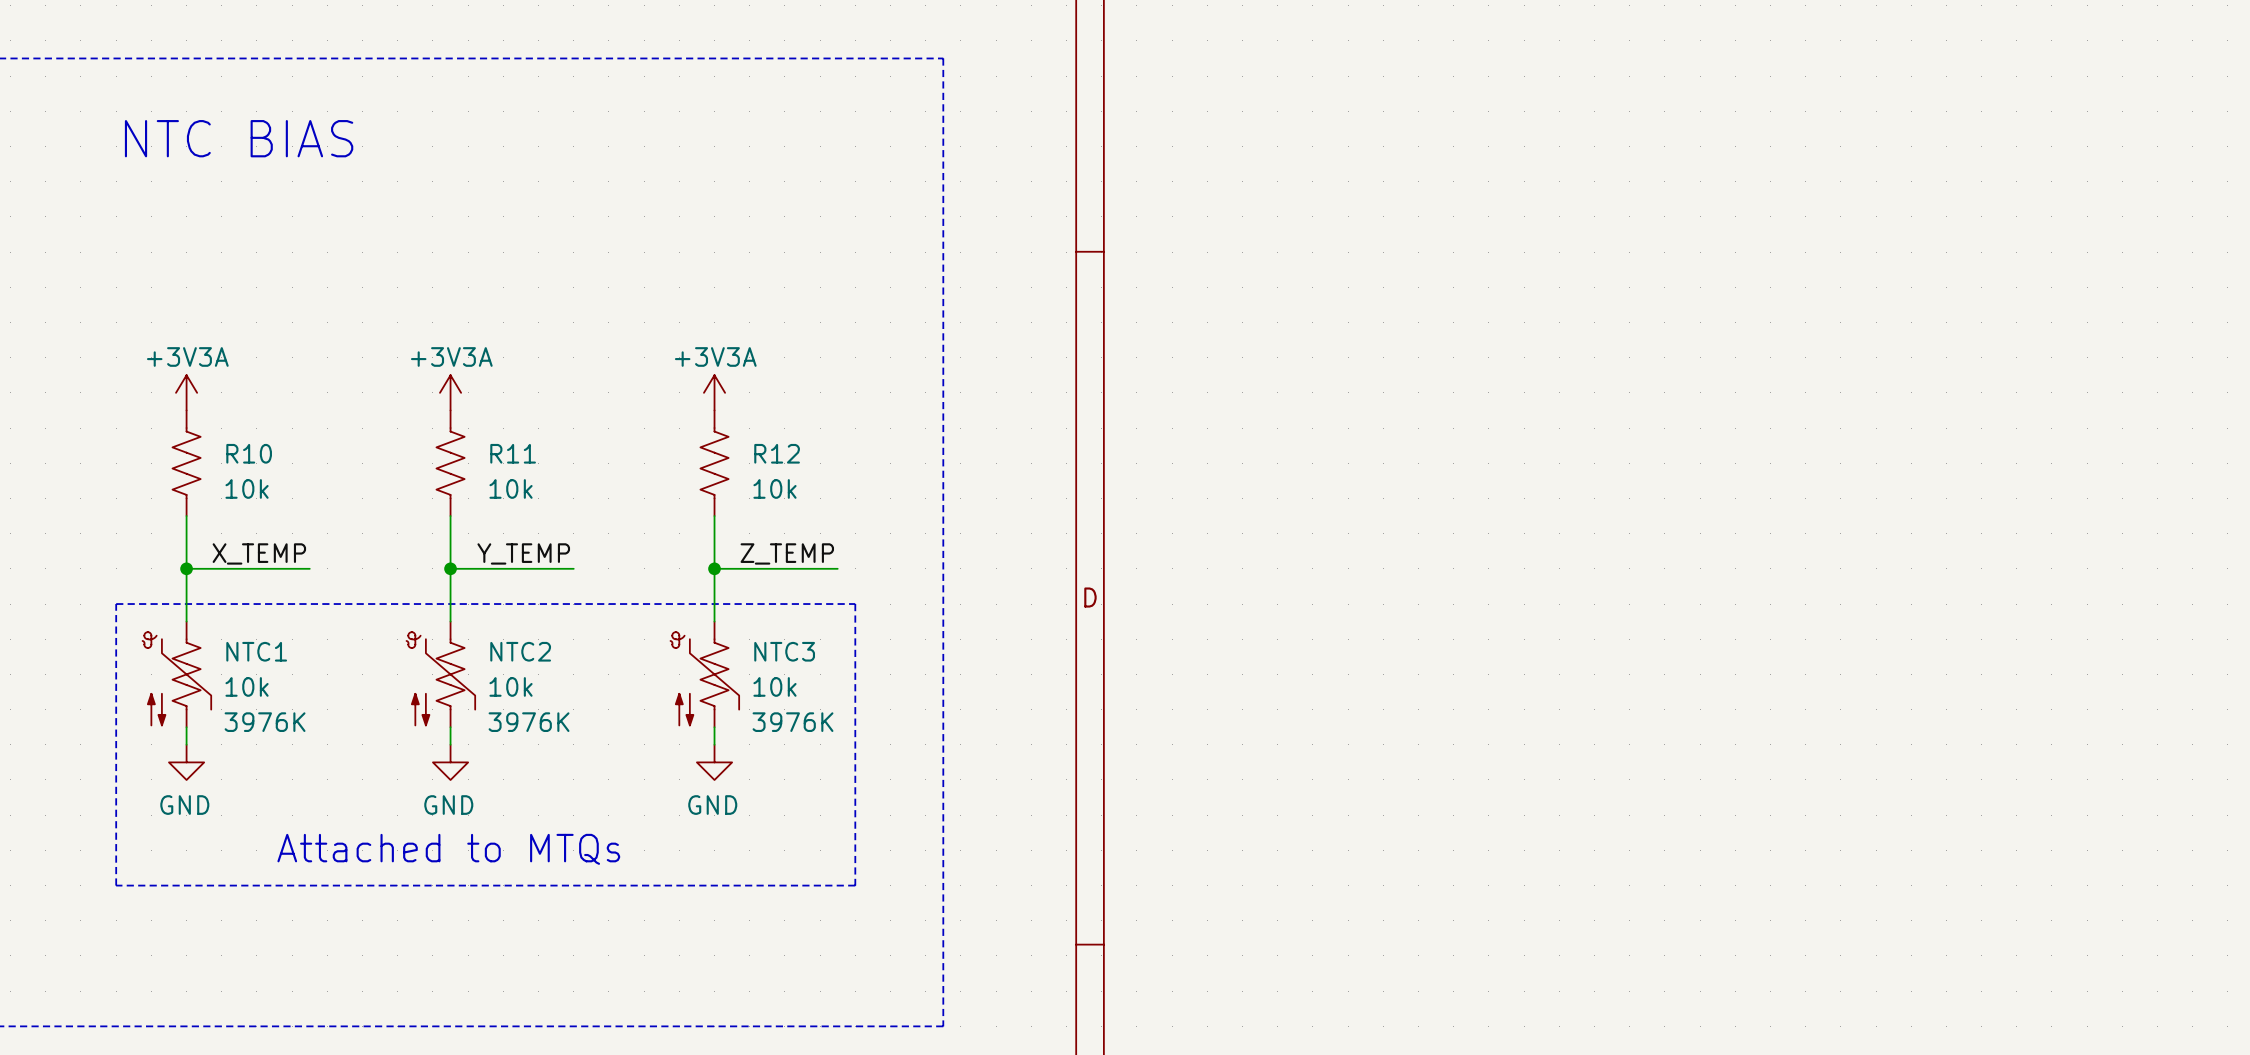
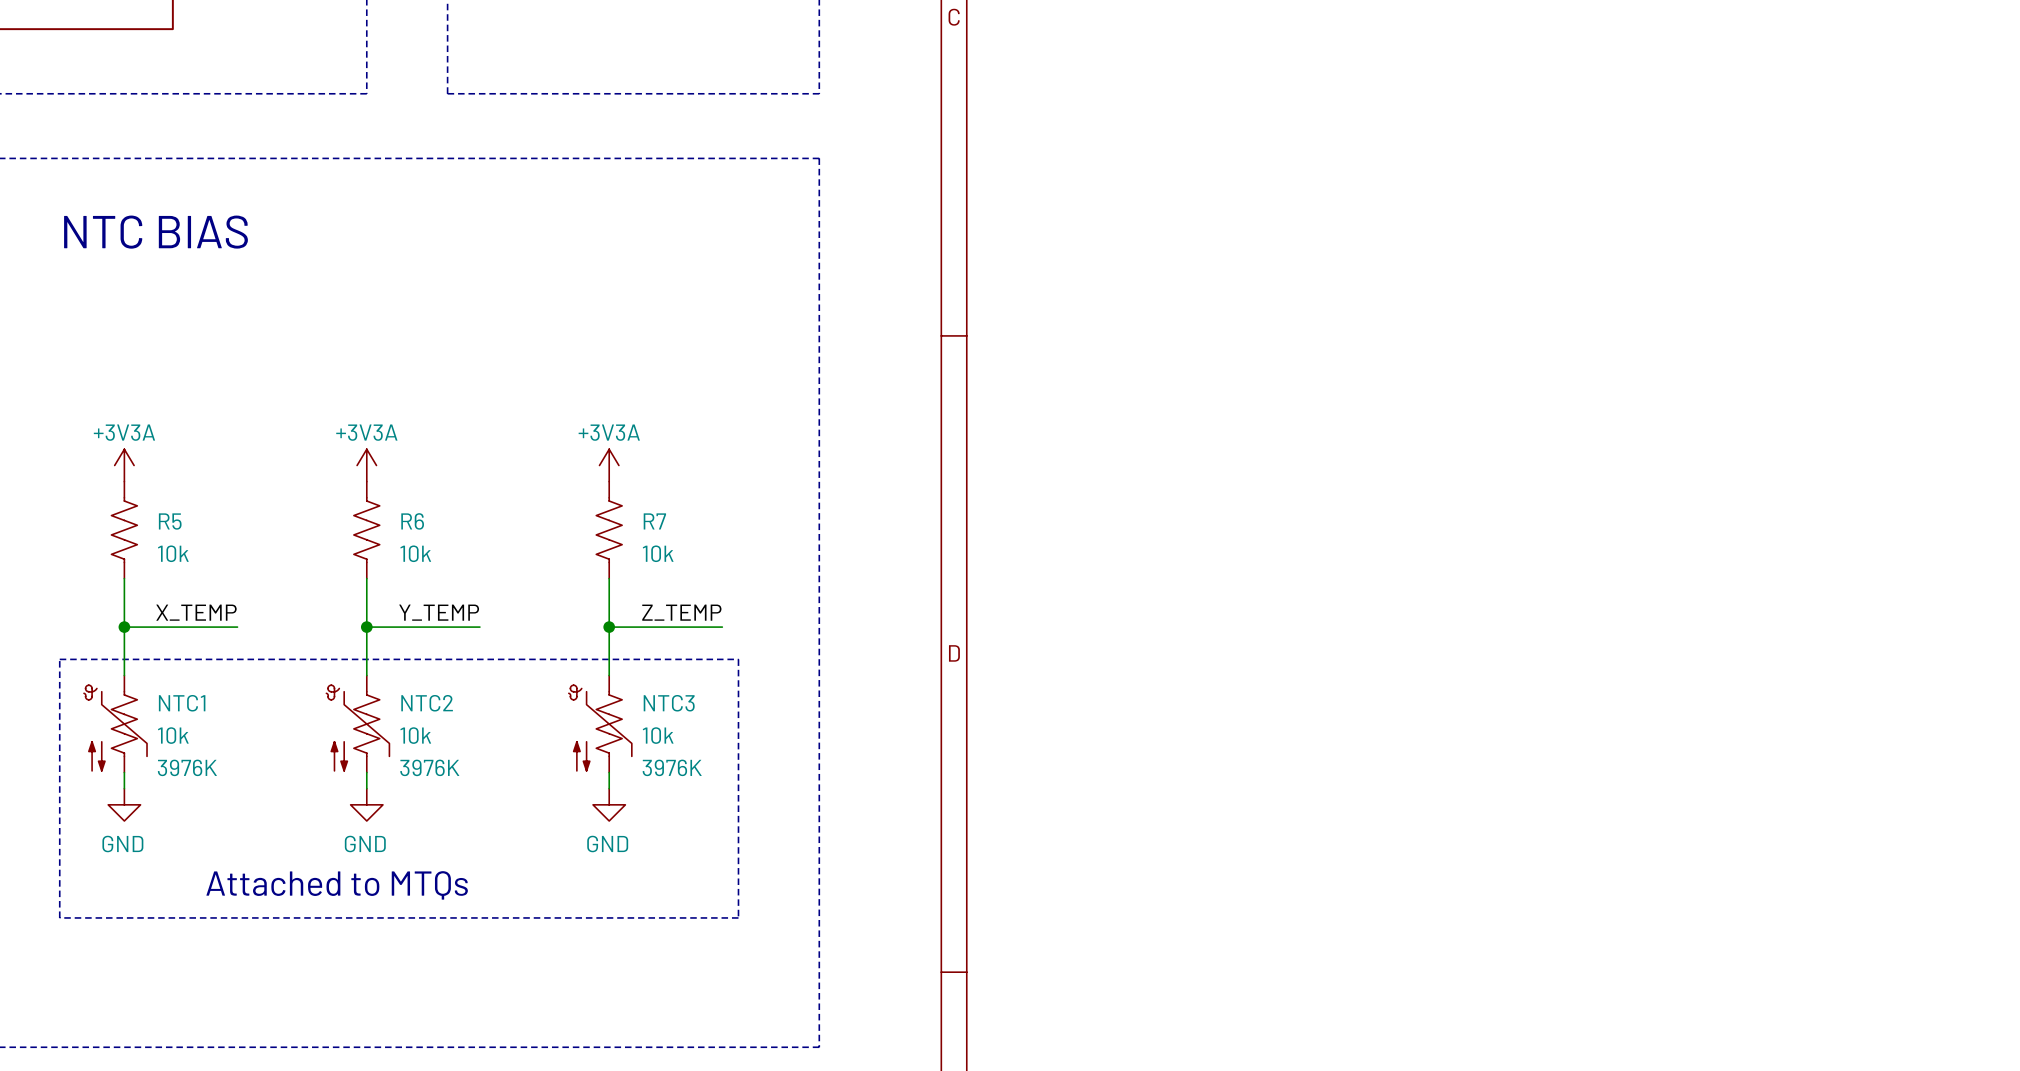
R10 name: R10 (249, 453) -> R5 (170, 521)
R11 name: R11 (513, 453) -> R6 (412, 521)
R12 name: R12 (777, 453) -> R7 (654, 521)

